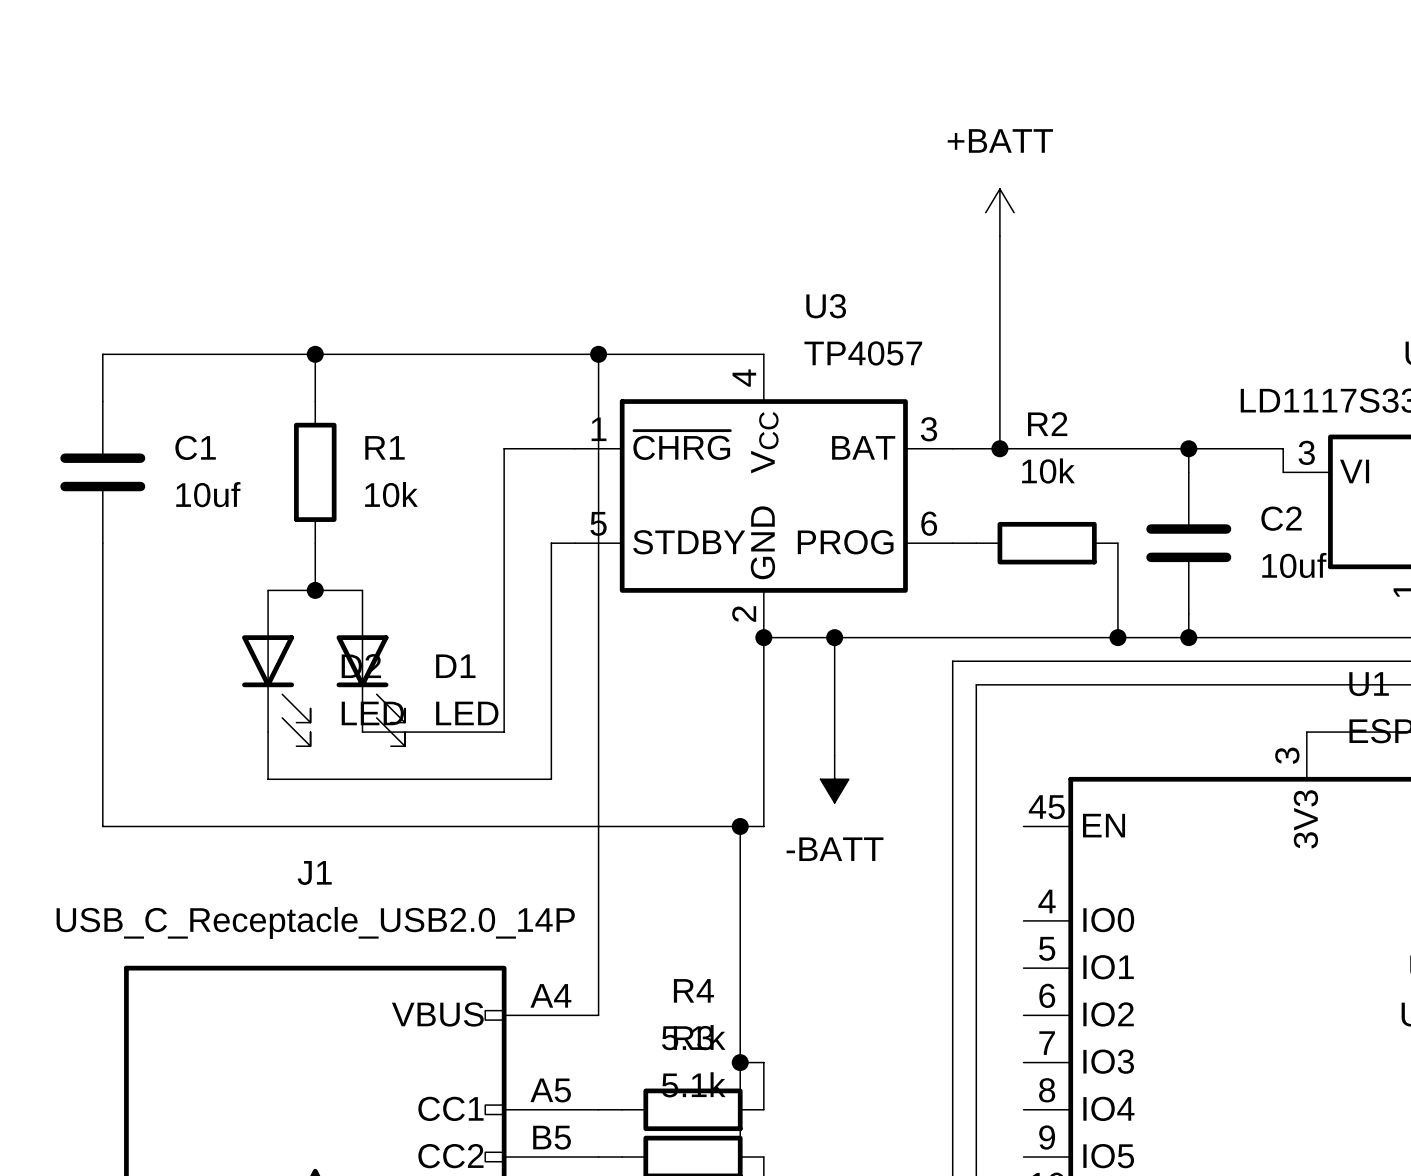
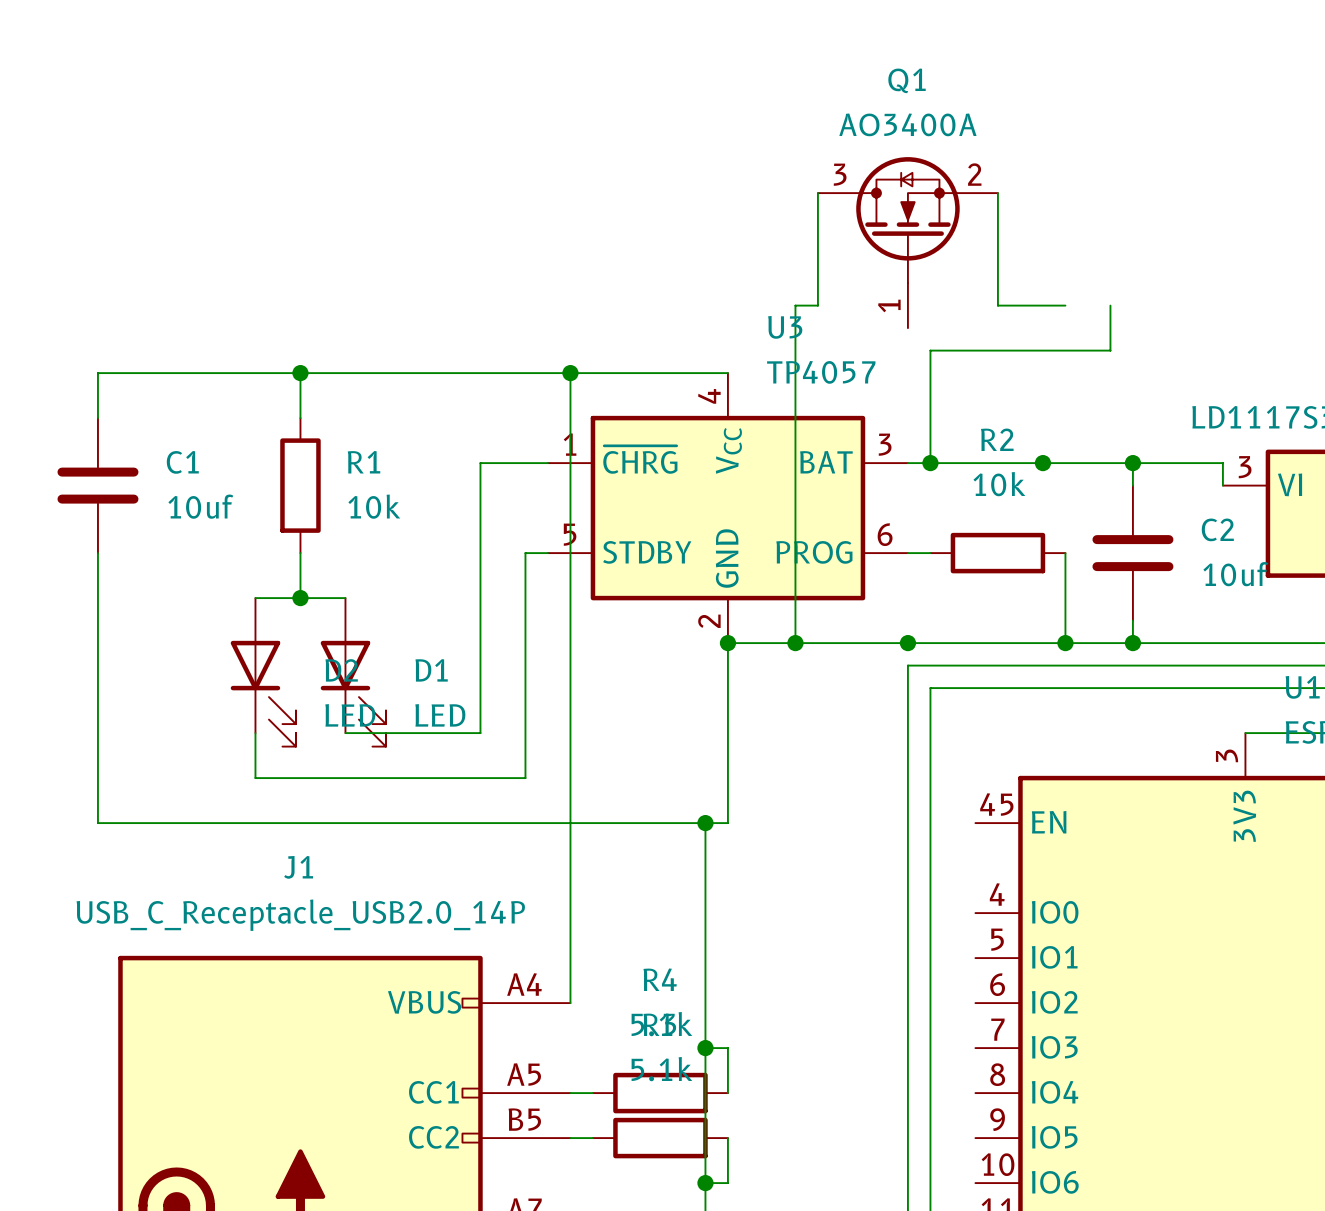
wire: none -> (997, 193) (997, 305) (1065, 305)
power symbol: +BATT (999, 212) -> none
Q1: none -> AO3400A (907, 242)
wire: (999, 236) (999, 448) -> none
wire: none -> (1110, 305) (1110, 350) (930, 350) (930, 463)
junction position: (999, 448) -> (930, 463)
junction: none -> (1042, 463)
wire: (834, 637) (834, 755) -> (795, 643) (795, 305) (817, 305) (817, 193)
junction: none -> (907, 643)
power symbol: -BATT (834, 779) -> none

